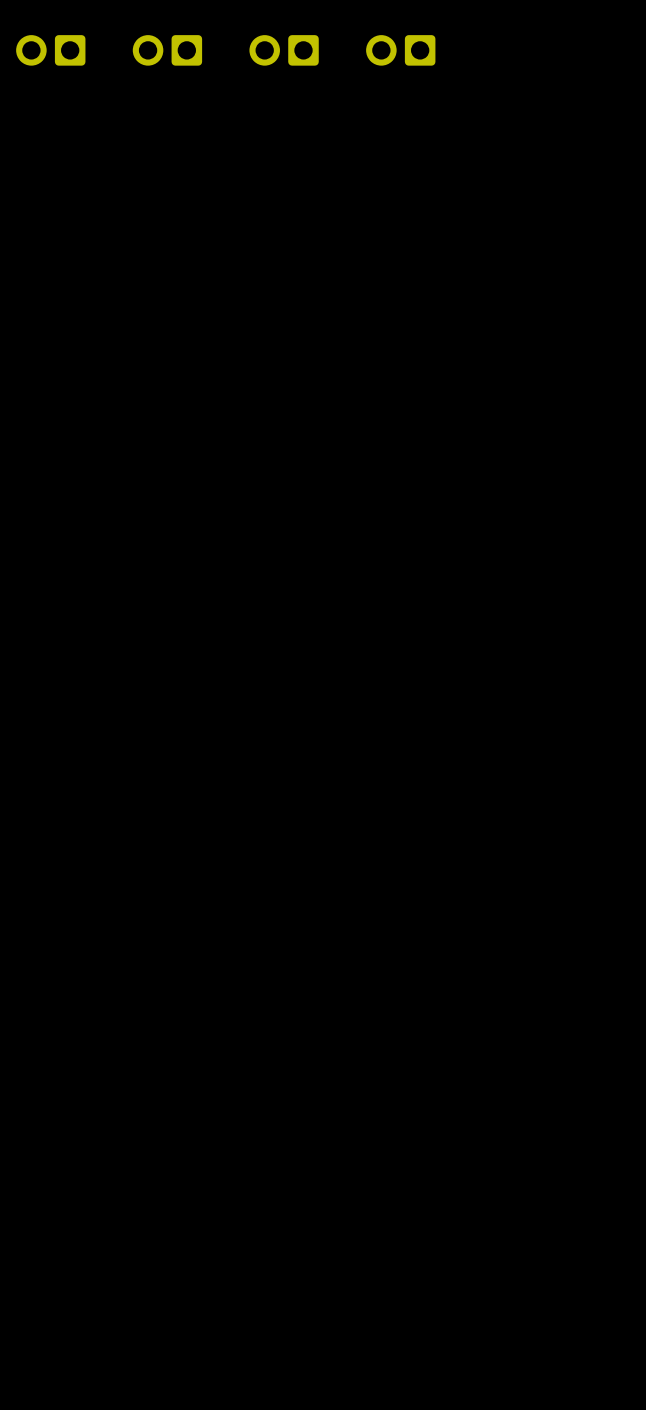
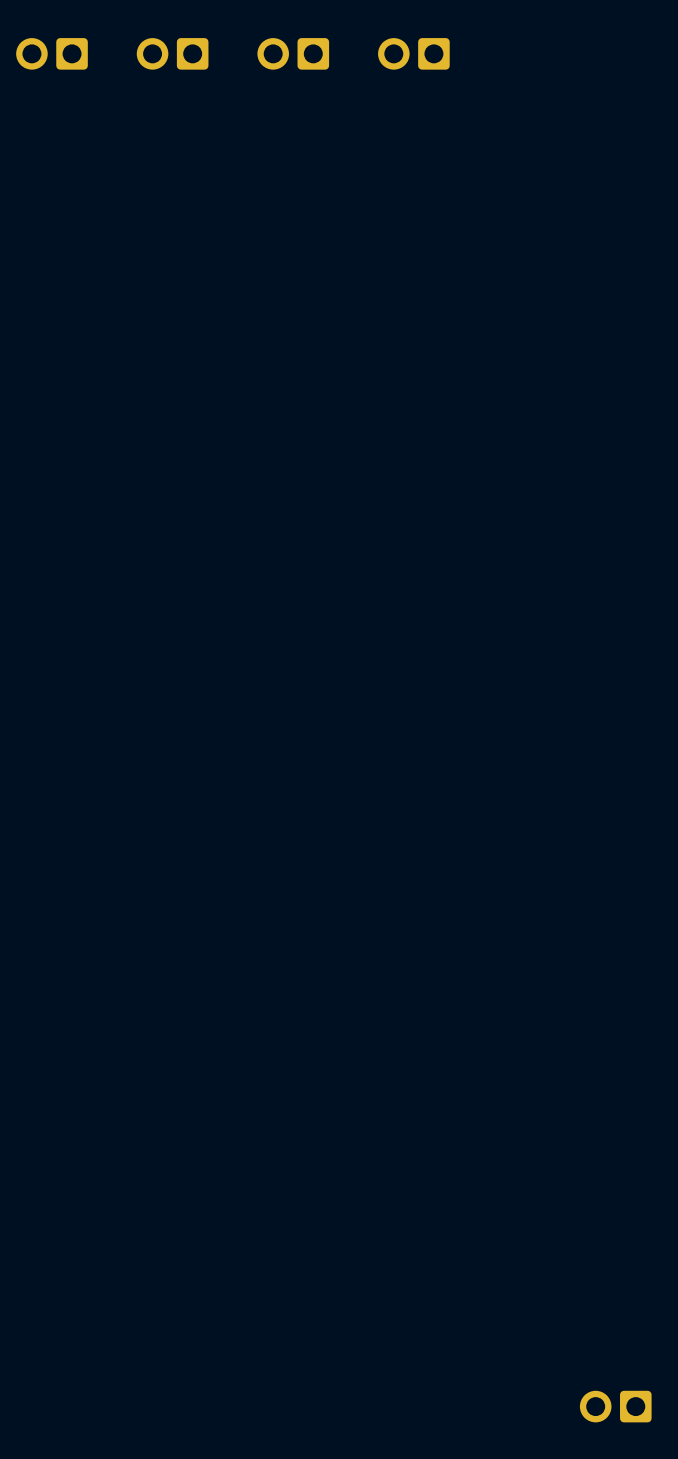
part: none -> (615, 1406)

